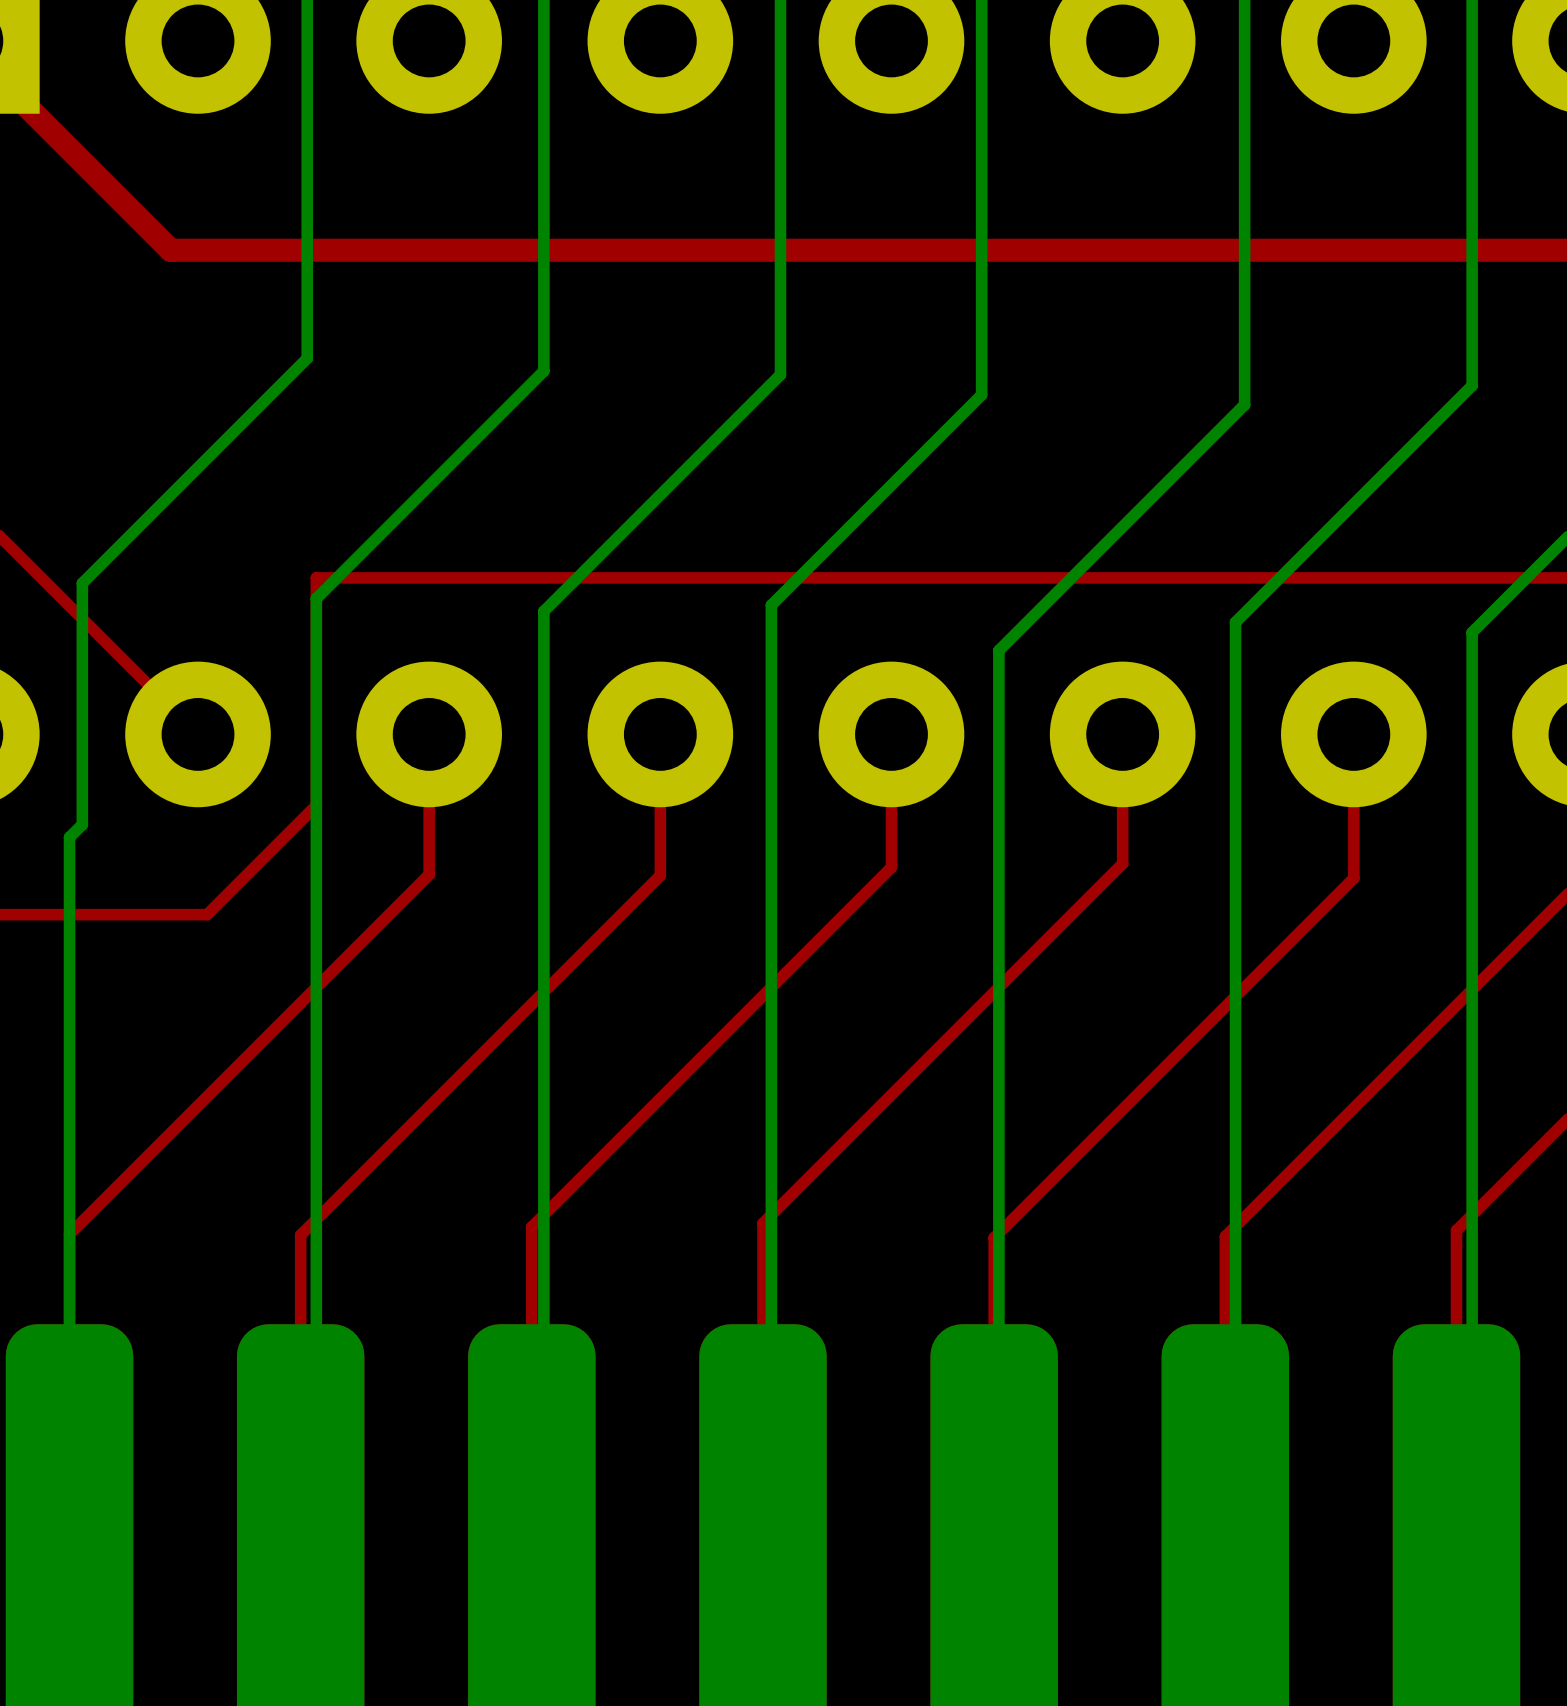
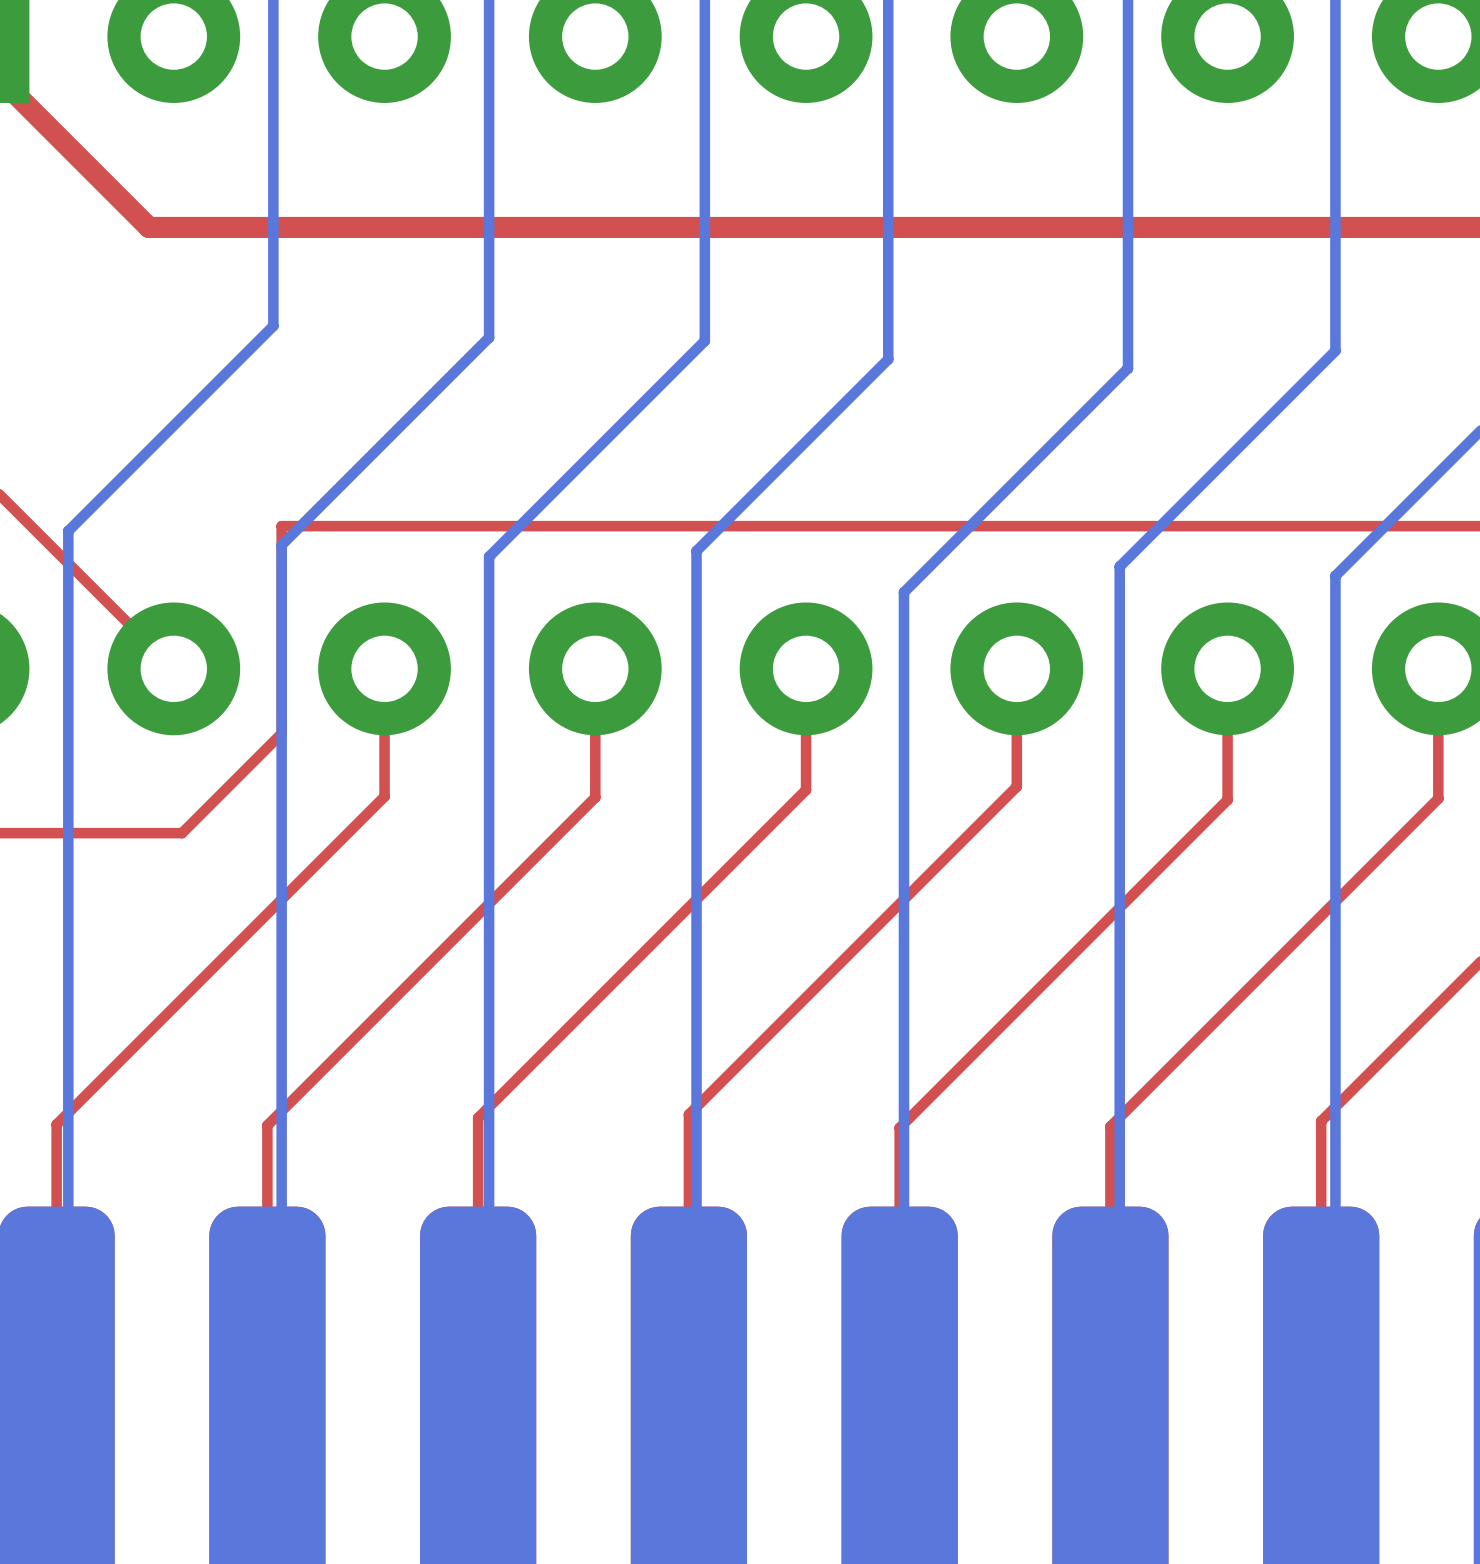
bottom track: (82, 824) (69, 837) (69, 1647) -> (68, 751) (68, 1489)

